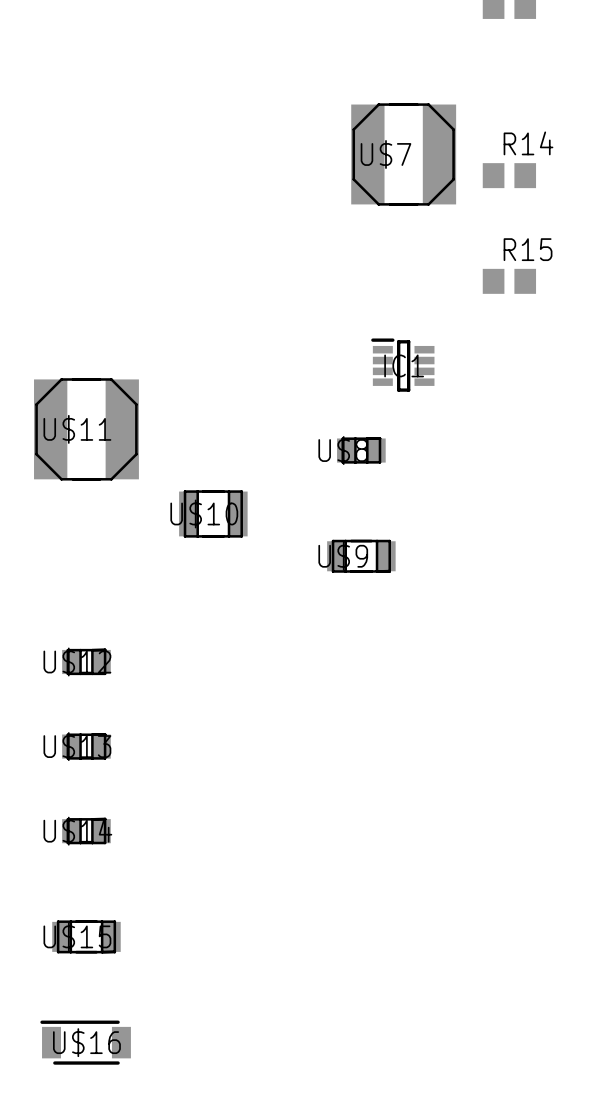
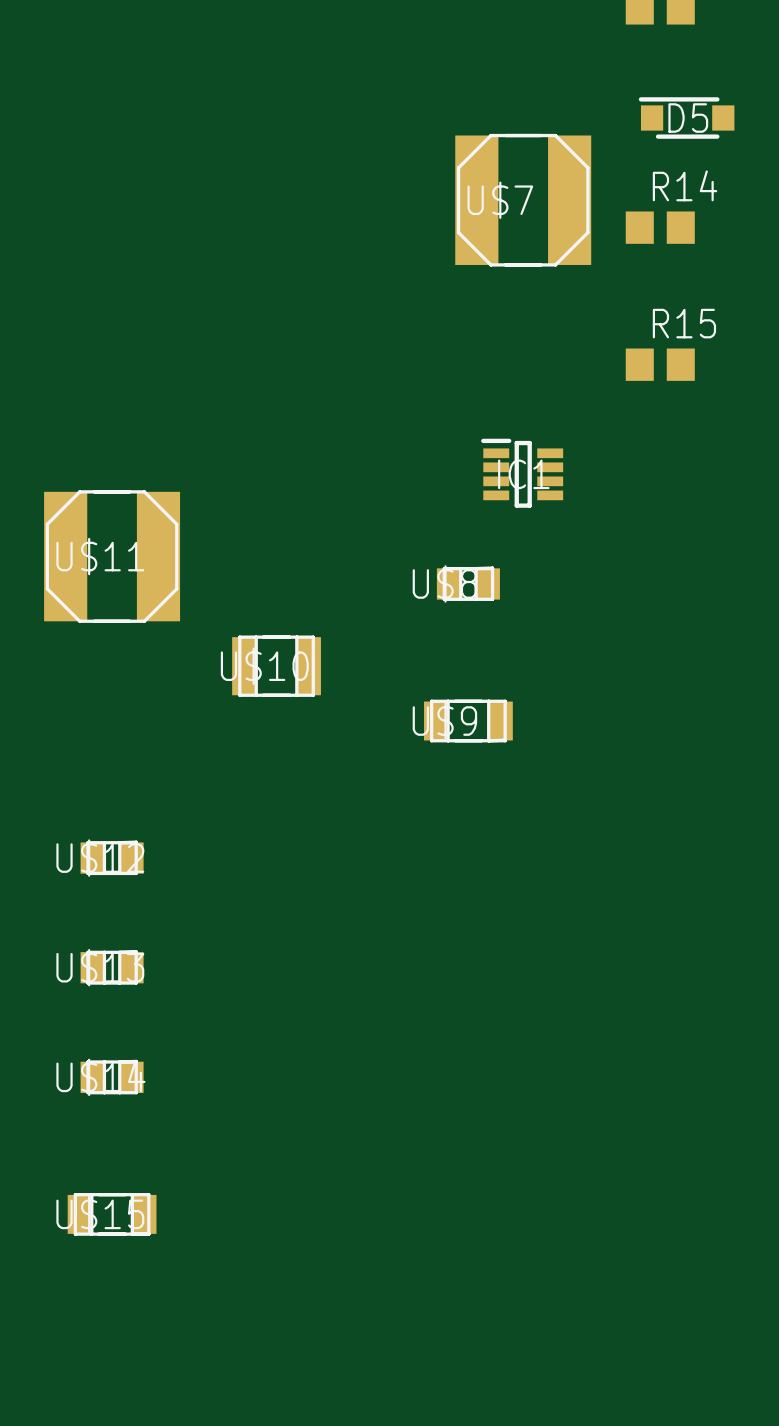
D5: none -> (686, 118)
U$16: (85, 1042) -> none

